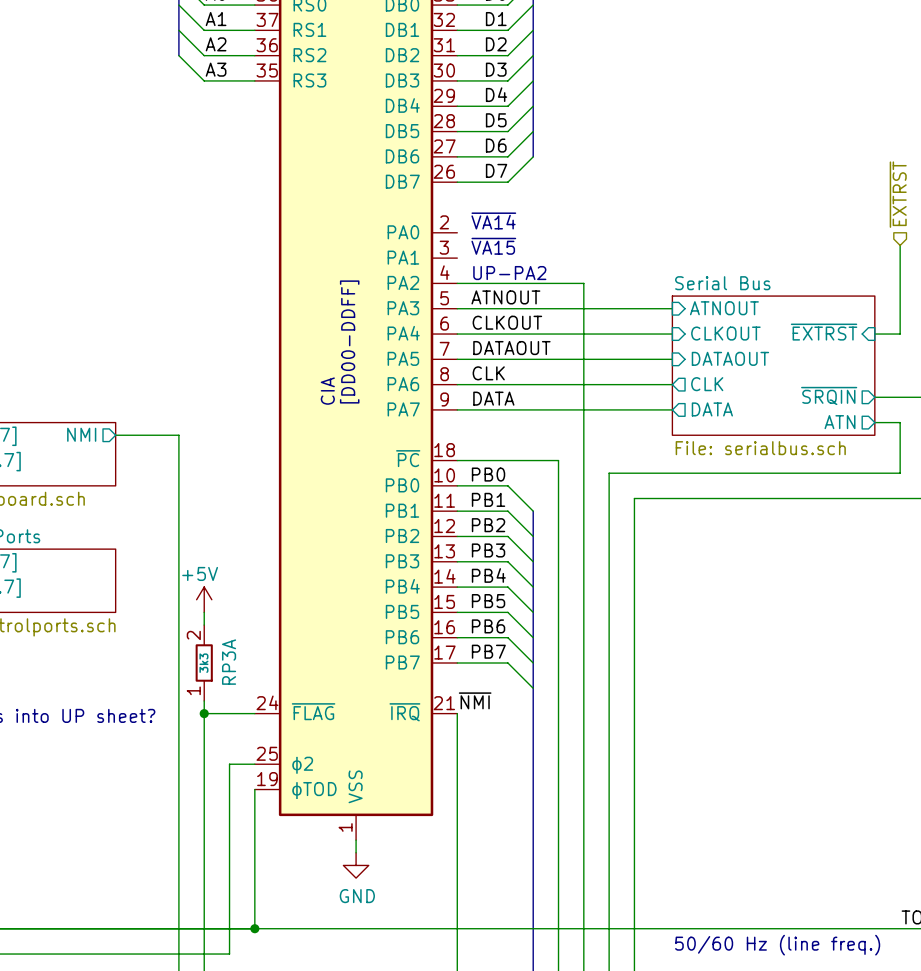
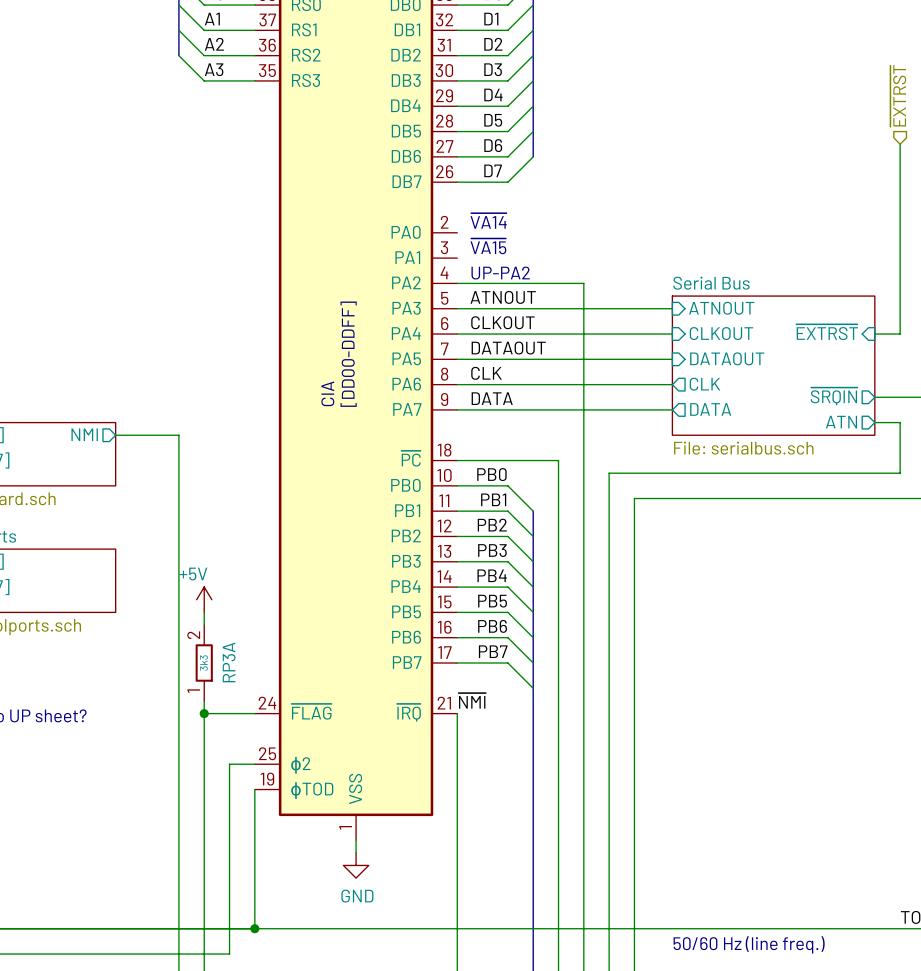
wire: none -> (900, 144) (900, 245)
hierarchical label position: ~{EXTRST} (898, 194) -> ~{EXTRST} (898, 96)

